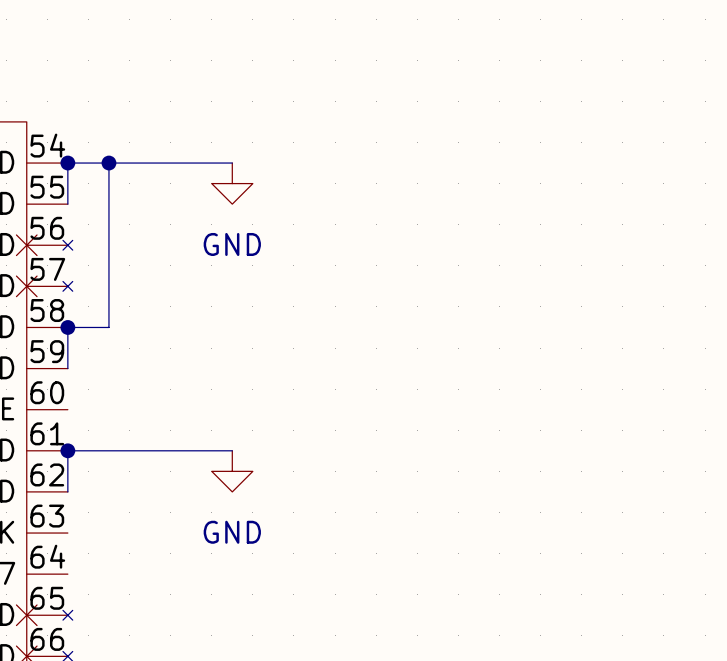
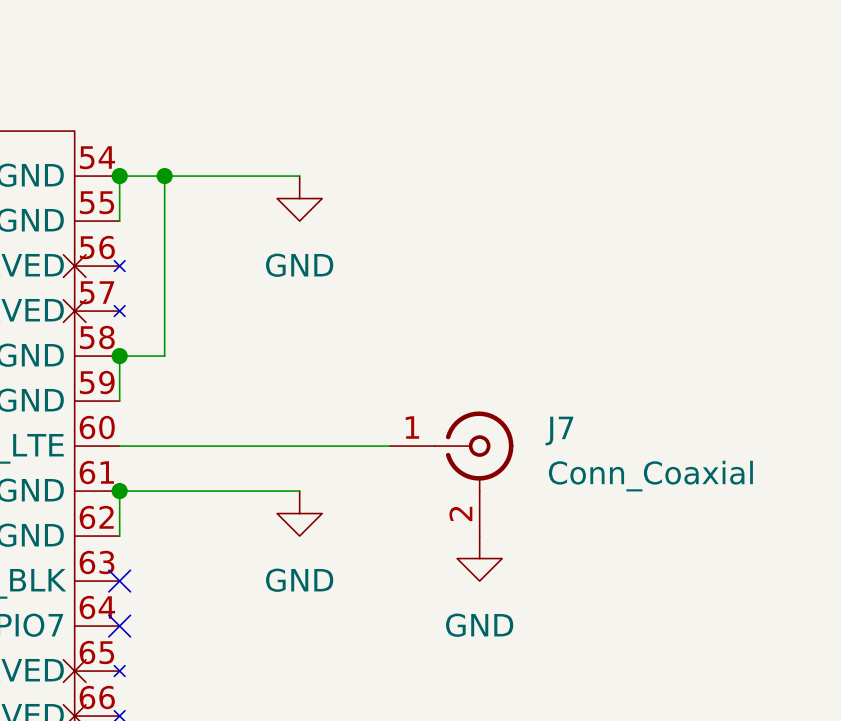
wire: none -> (119, 446) (389, 446)
J7: none -> Conn_Coaxial (451, 473)
power symbol: none -> GND (479, 558)
no-connect mark: none -> (119, 581)
no-connect mark: none -> (119, 626)

